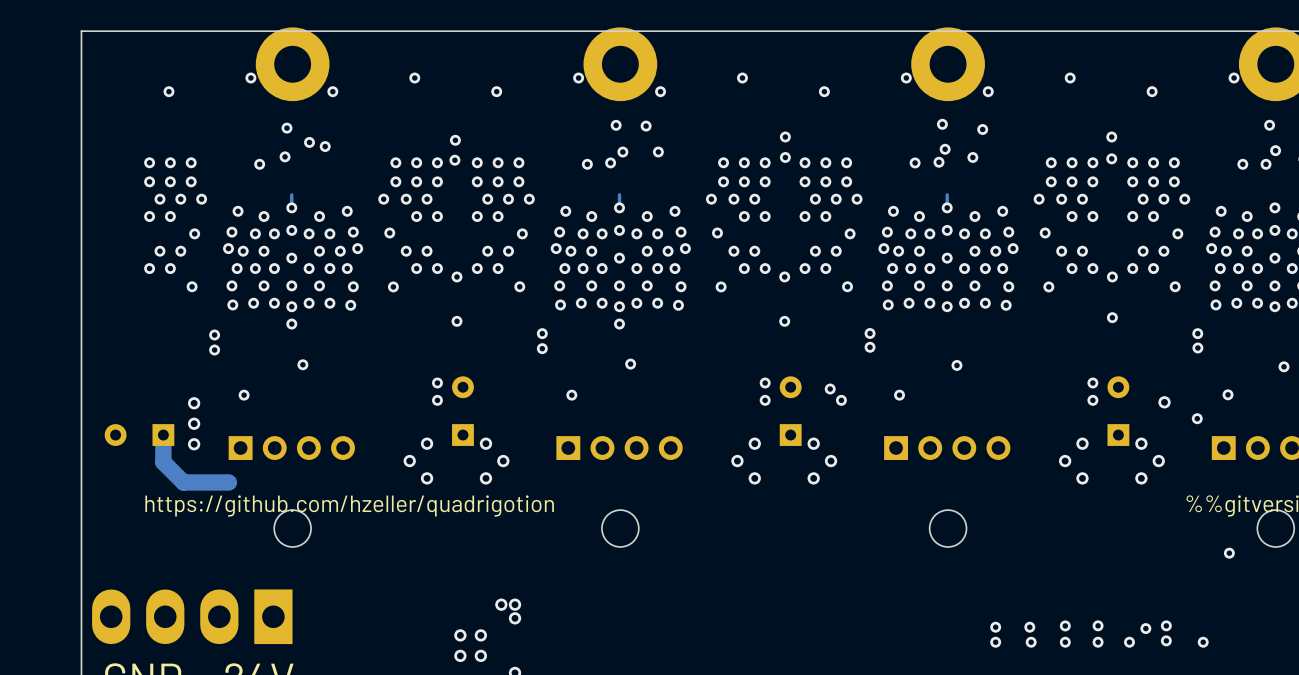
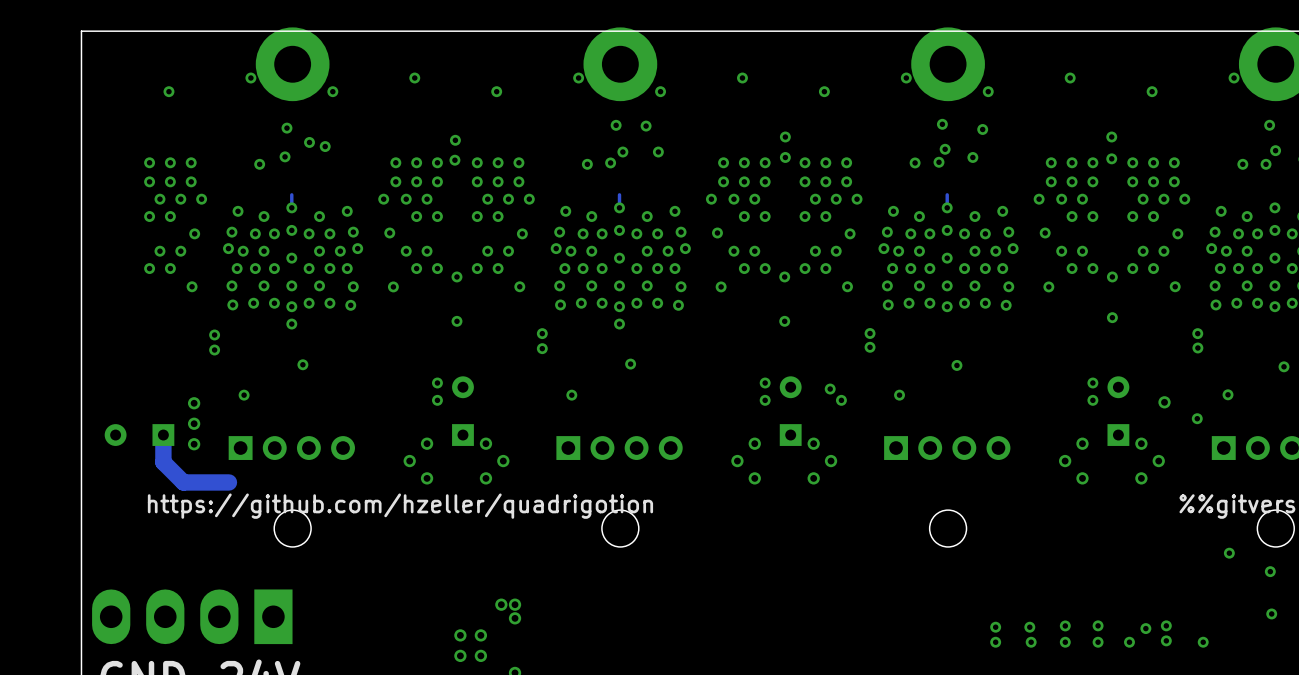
via: none -> (1270, 571)
via: none -> (1271, 613)

